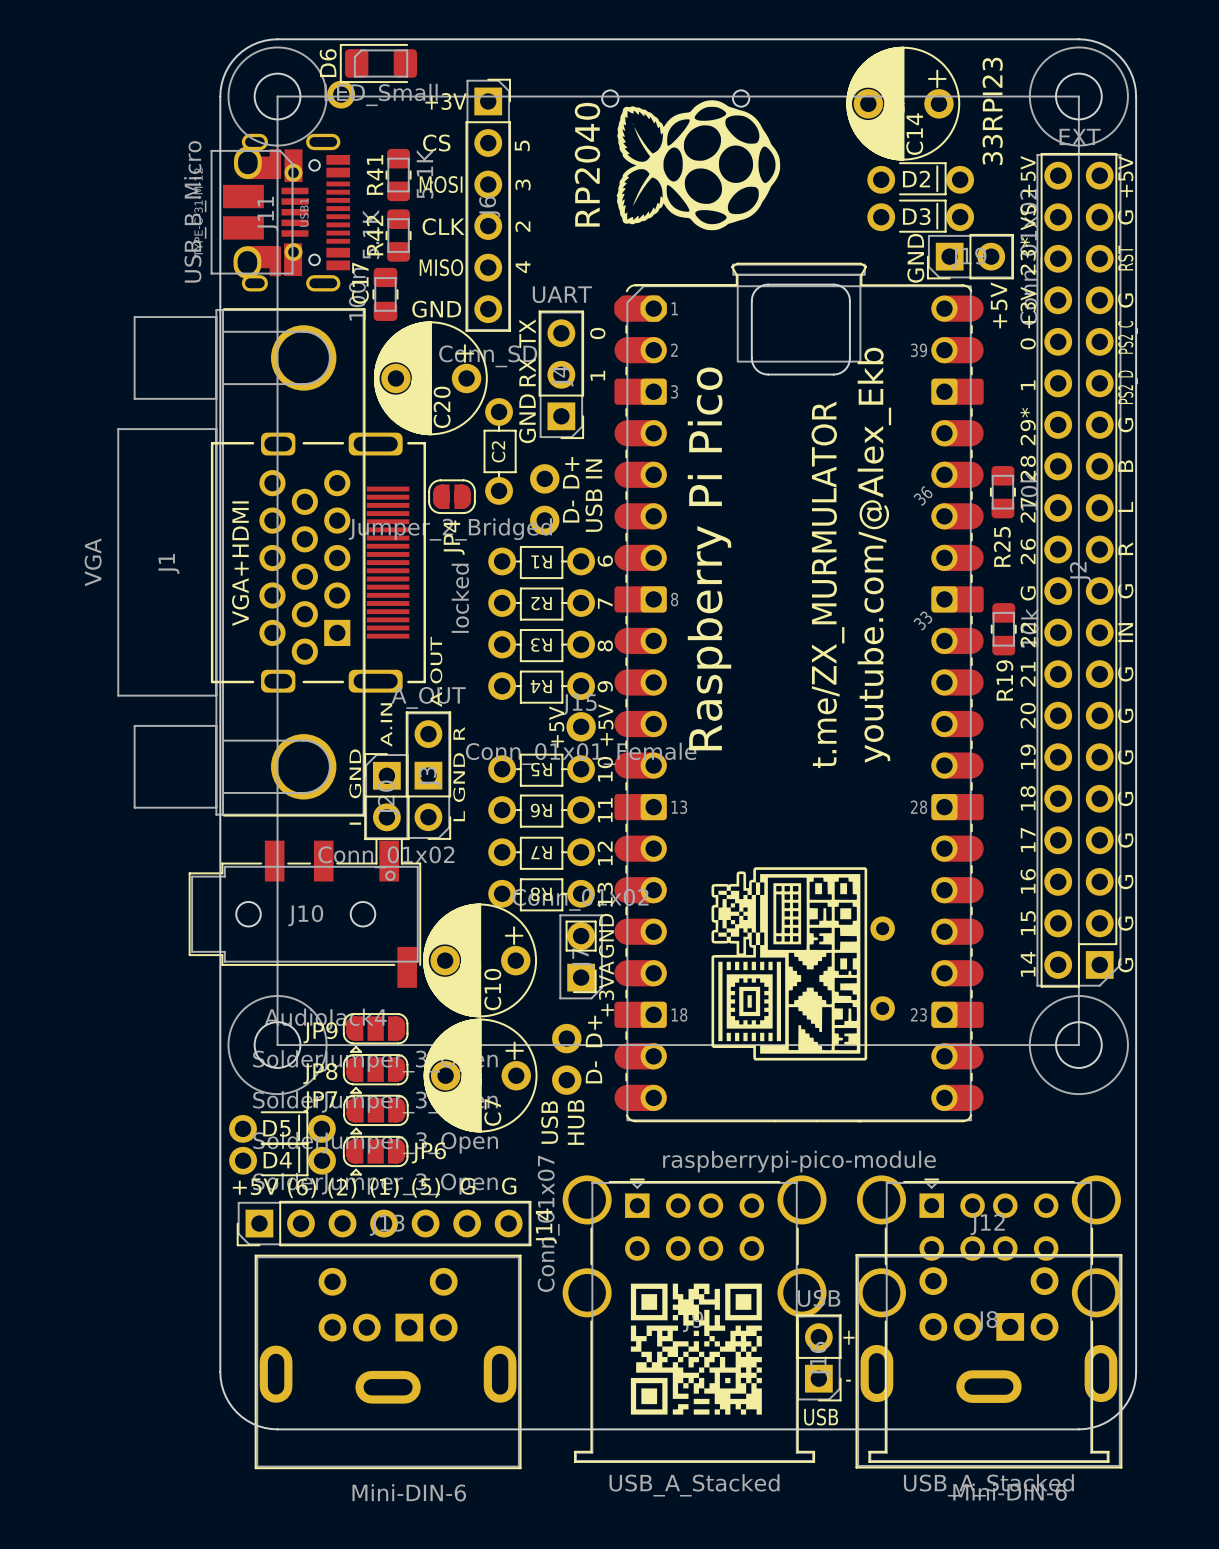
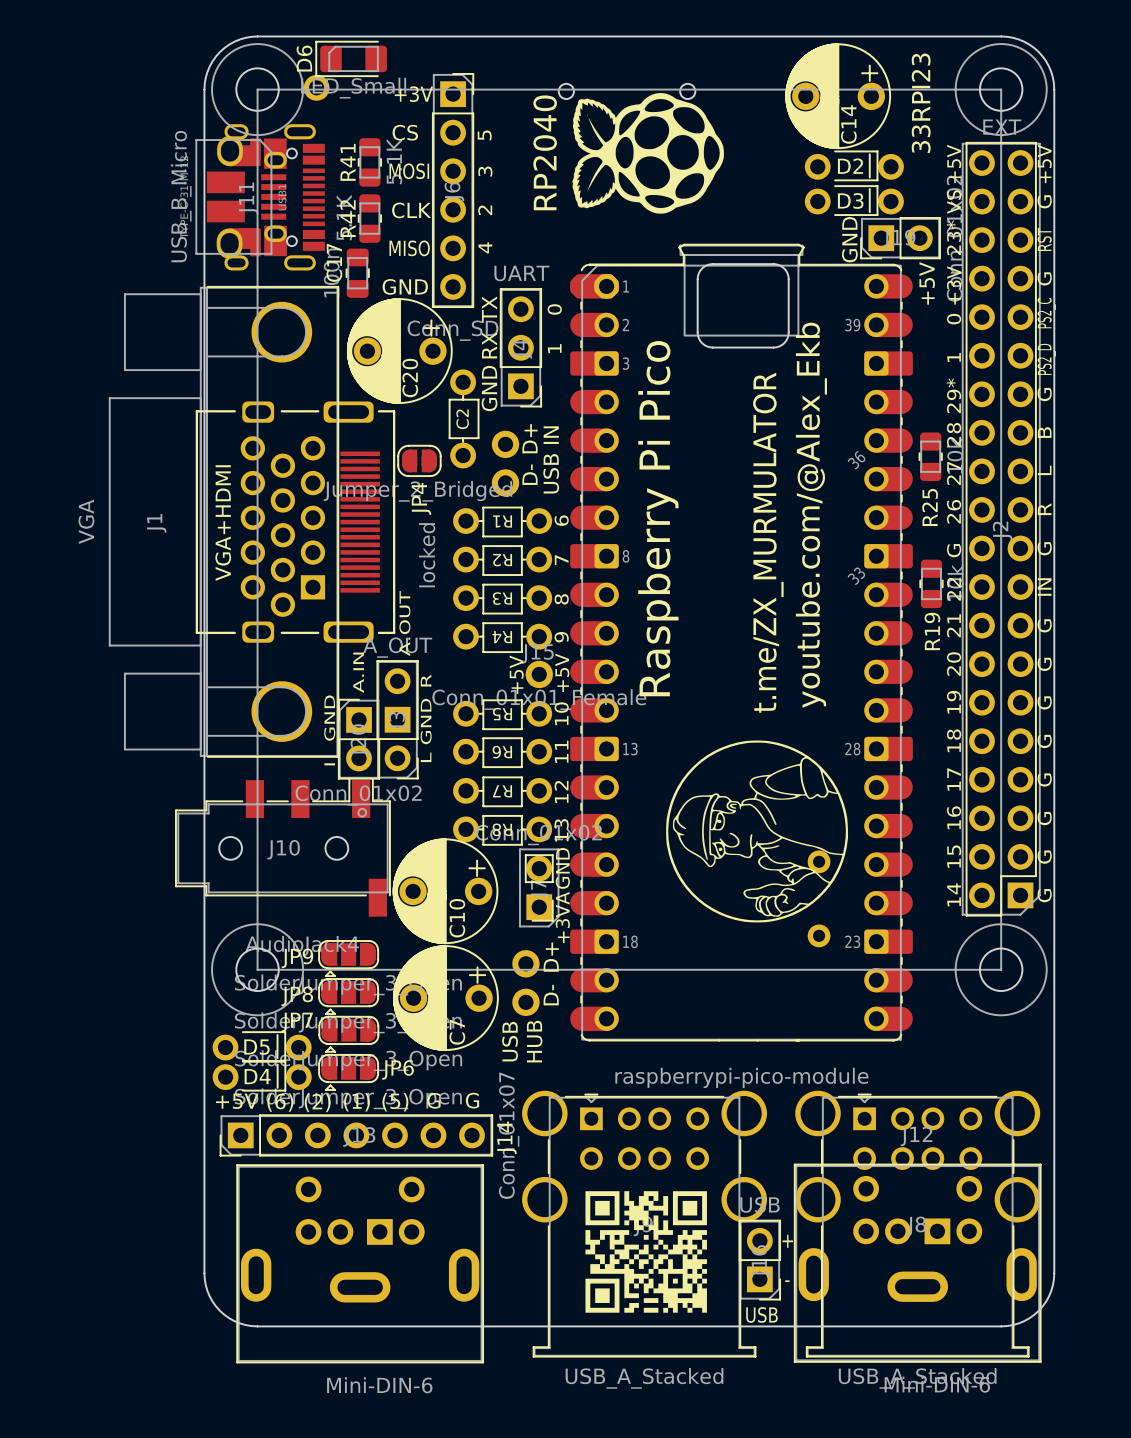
J11 footprint: [210, 146, 309, 279] -> [195, 135, 287, 259]
drawing: none -> [666, 740, 849, 923]
drawing: [711, 867, 868, 1061] -> none

